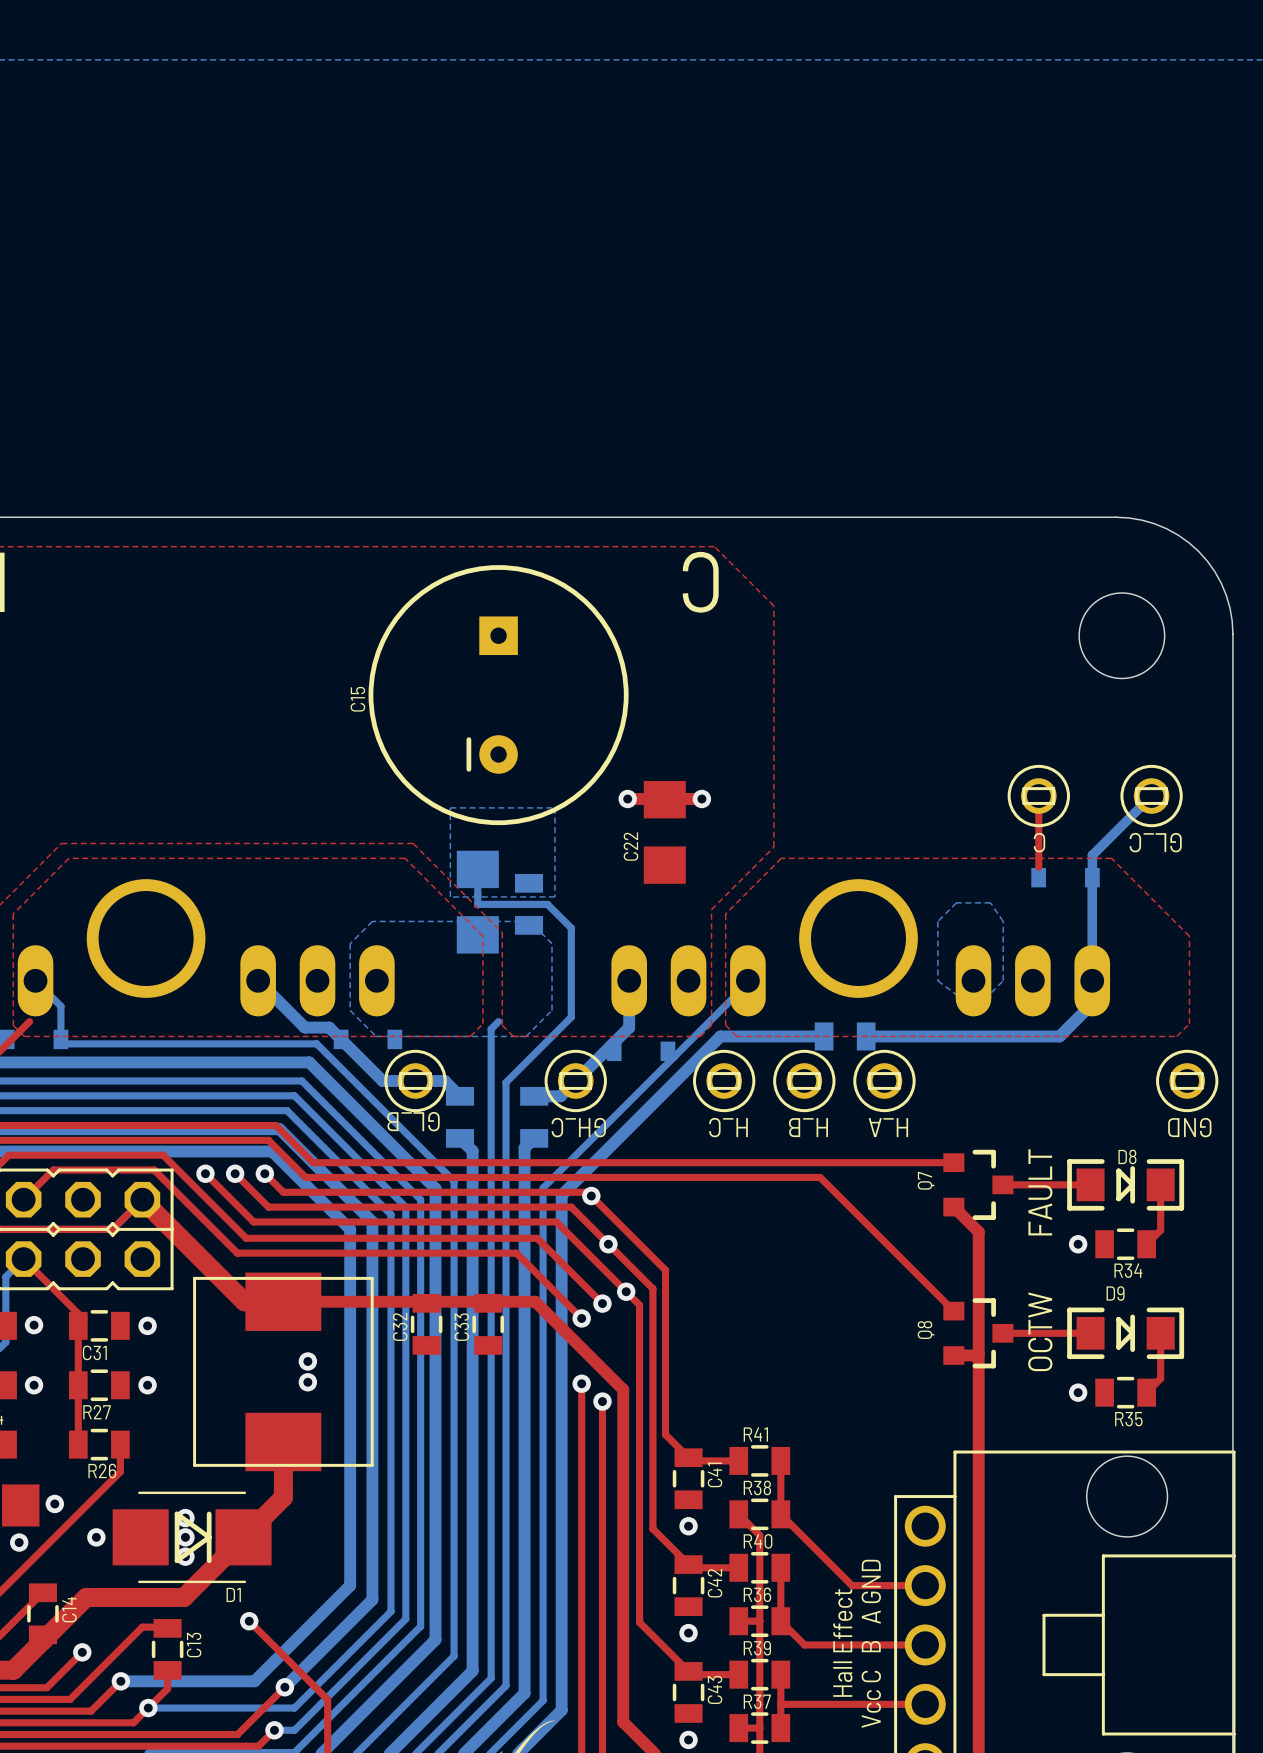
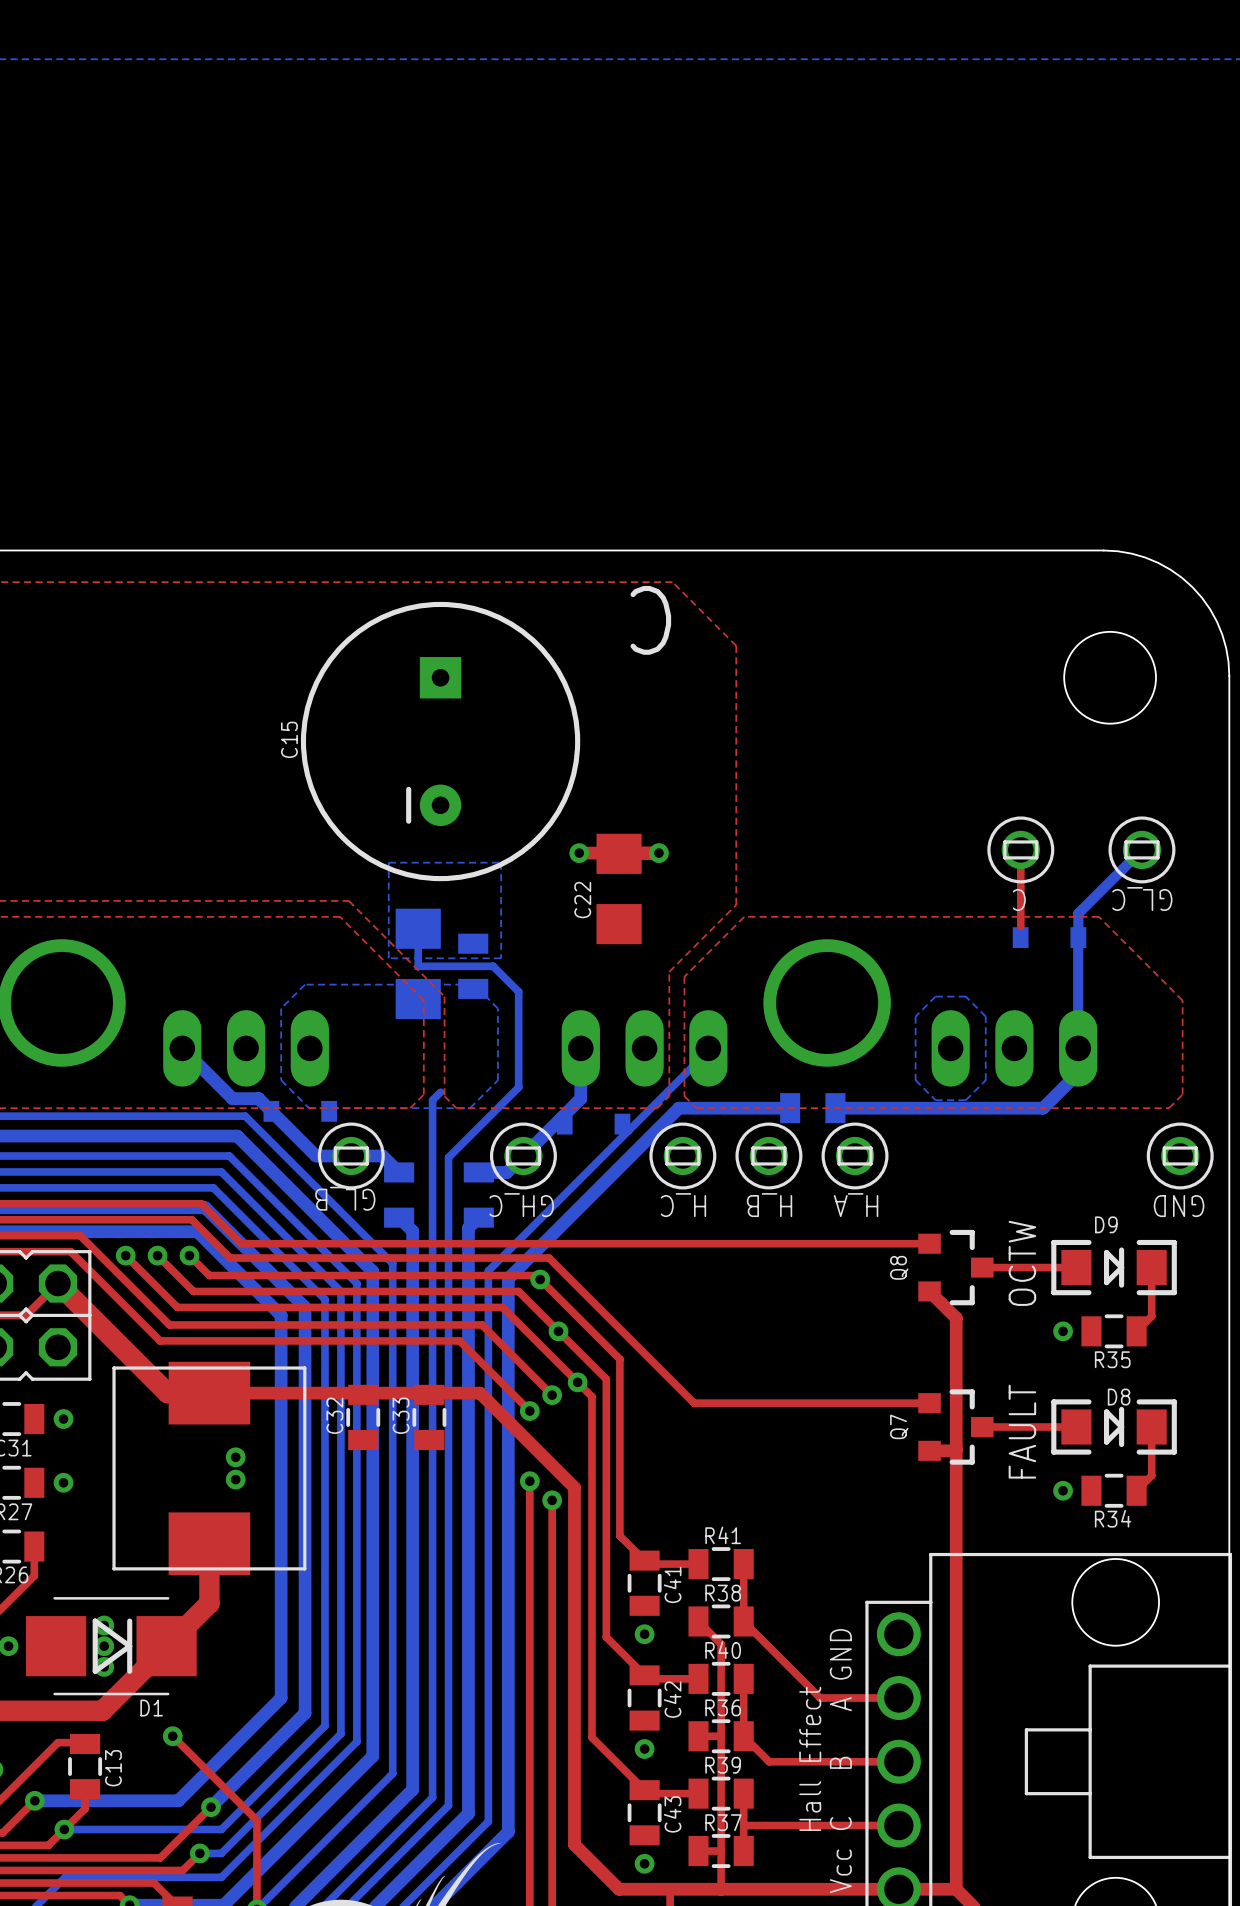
bottom zone outline: (956, 902) (990, 902) (1003, 921) (1003, 980) (984, 999) (962, 999) (937, 980) (937, 921) (956, 902) -> none
bottom zone outline: none -> (935, 996) (965, 996) (985, 1016) (985, 1080) (965, 1100) (935, 1100) (915, 1080) (915, 1016) (935, 996)
top track: (267, 1140) (305, 1177) (820, 1177) (953, 1311) -> (191, 1219) (230, 1258) (548, 1258) (694, 1403) (929, 1403)
D8 name: D8 (1127, 1156) -> D9 (1106, 1224)
Q7 name: Q7 (926, 1180) -> Q8 (899, 1267)
text: FAULT (1040, 1192) -> OCTW (1022, 1263)
R34 name: R34 (1128, 1270) -> R35 (1112, 1359)
D9 name: D9 (1115, 1293) -> D8 (1119, 1397)
Q8 name: Q8 (926, 1330) -> Q7 (899, 1426)
text: OCTW (1040, 1331) -> FAULT (1022, 1431)
R35 name: R35 (1128, 1419) -> R34 (1113, 1518)

